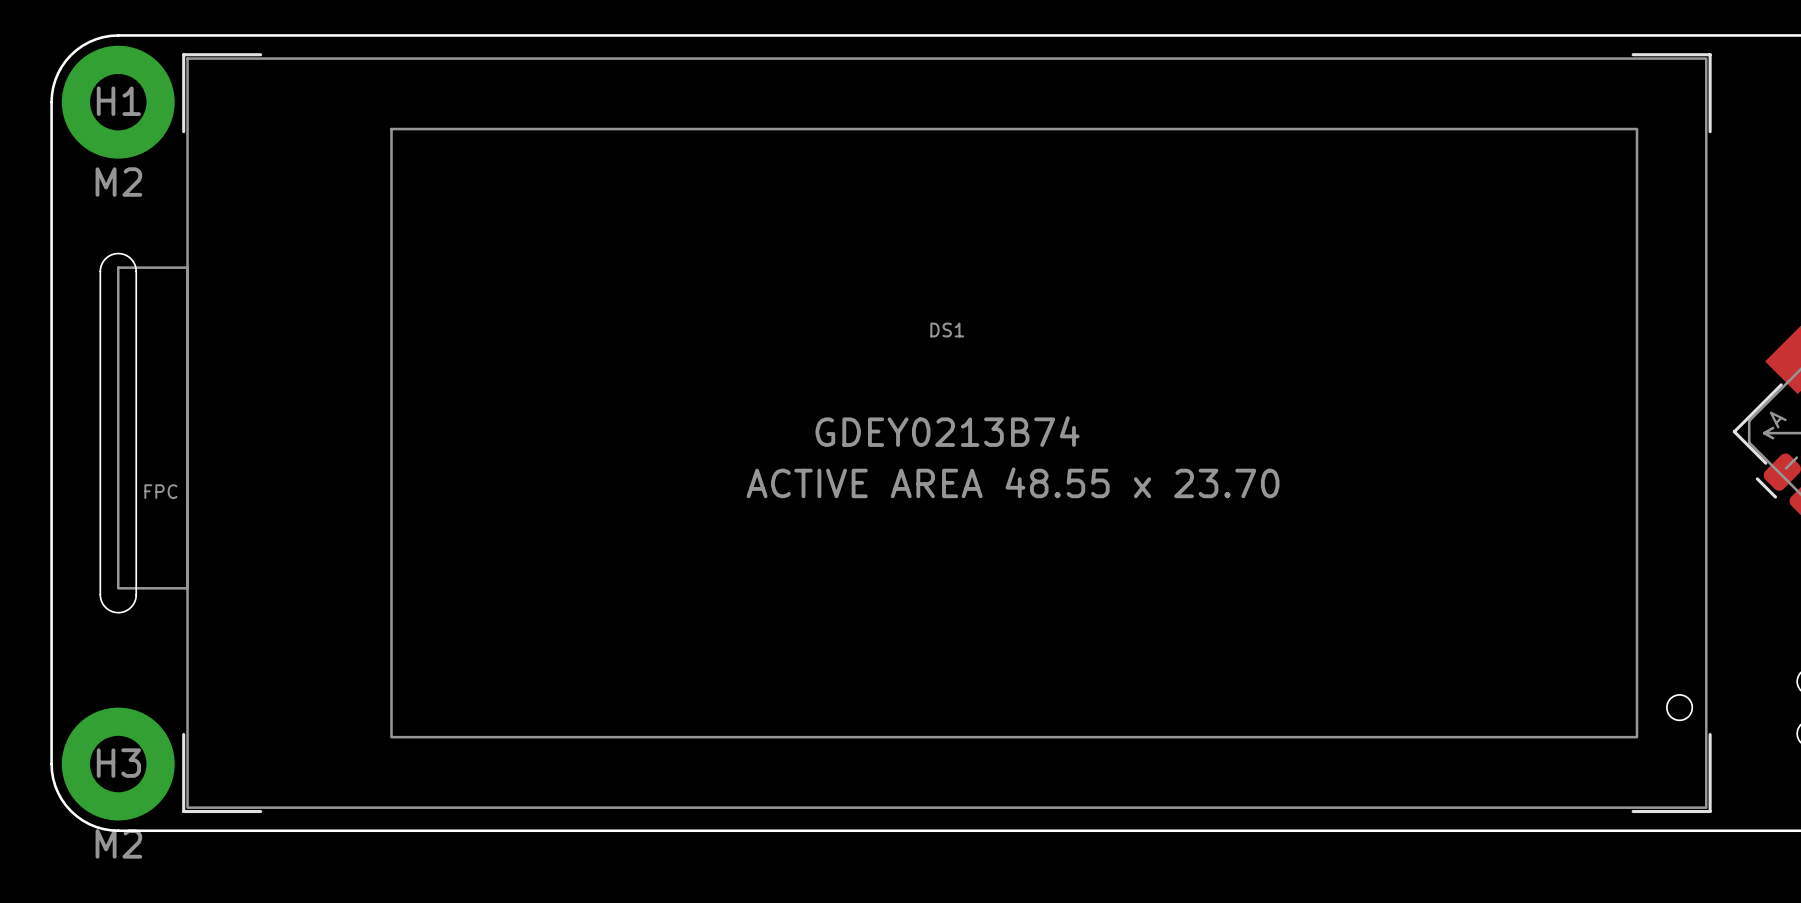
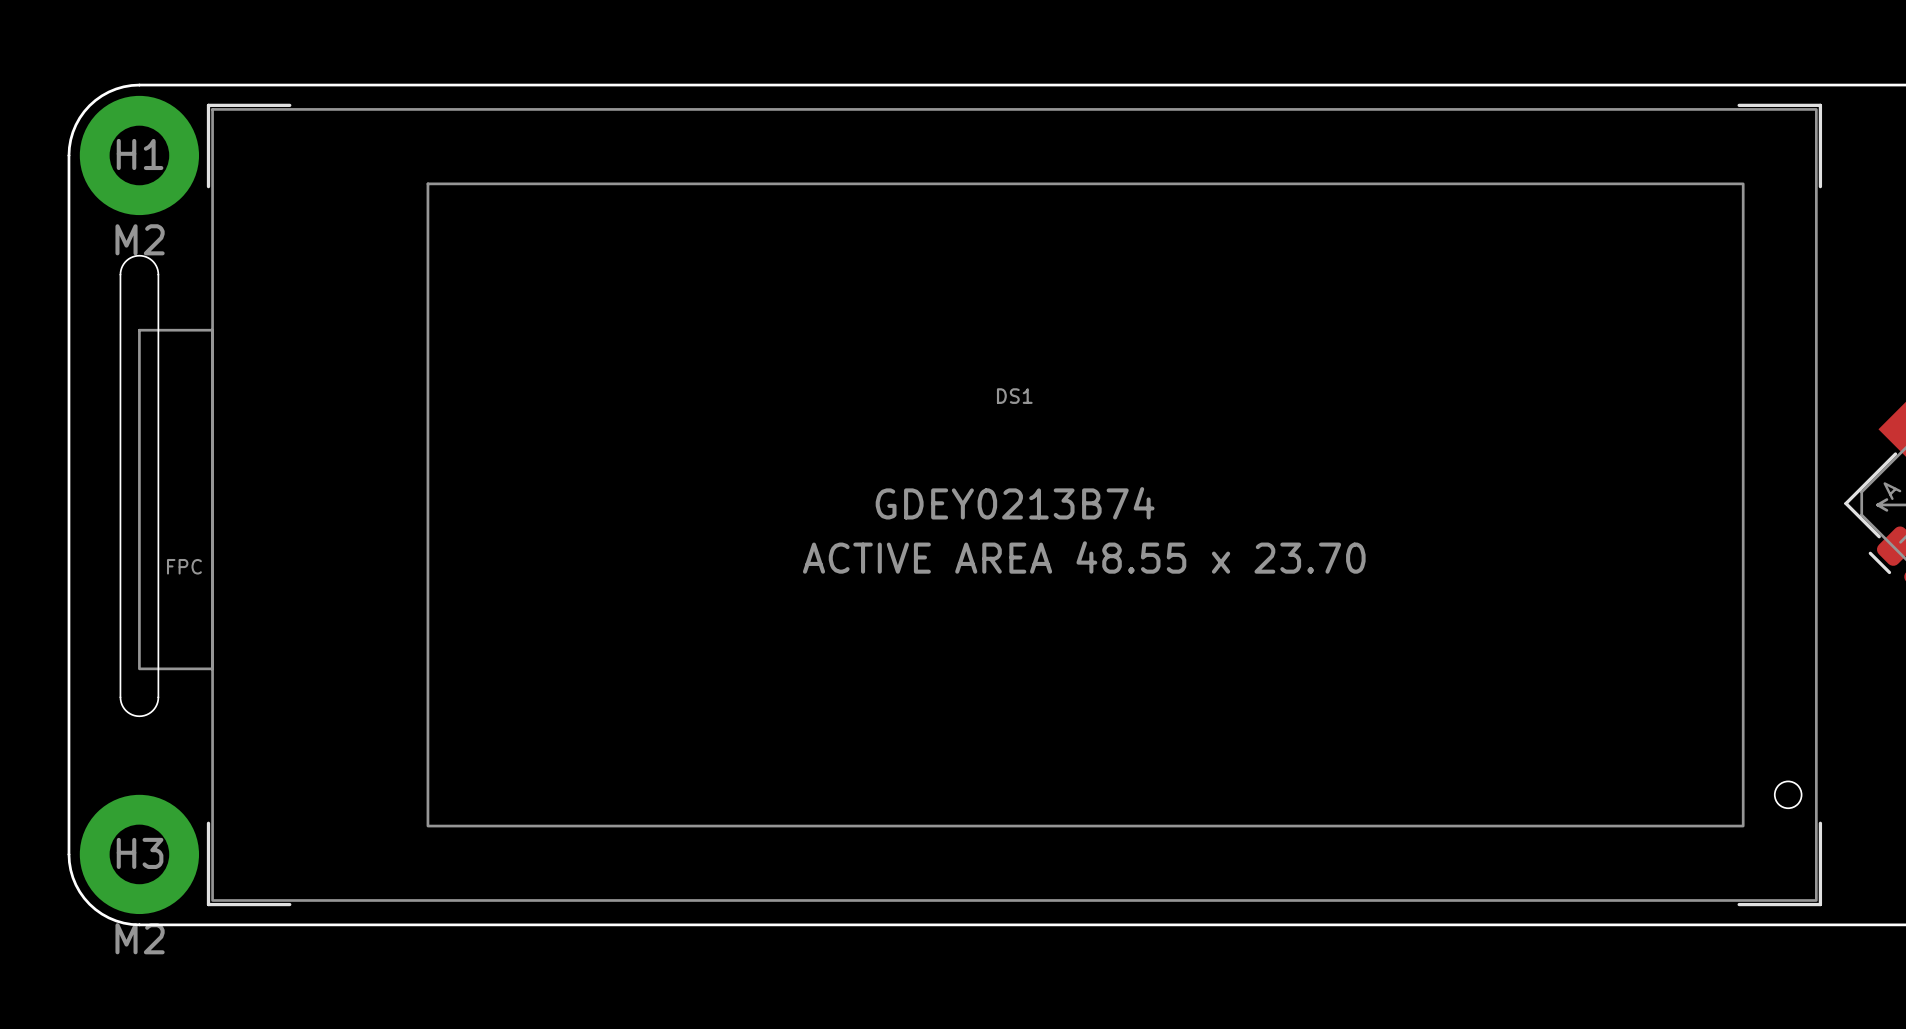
DS1 footprint: [99, 53, 1712, 814] -> [119, 103, 1823, 907]

